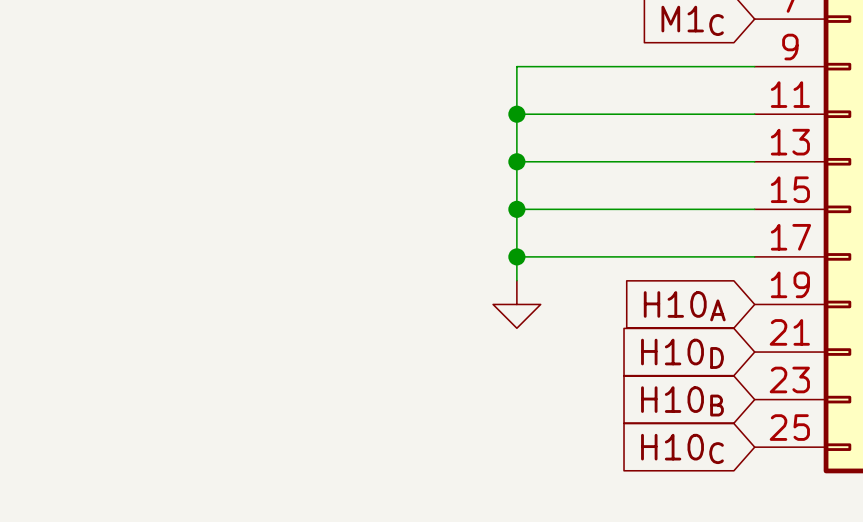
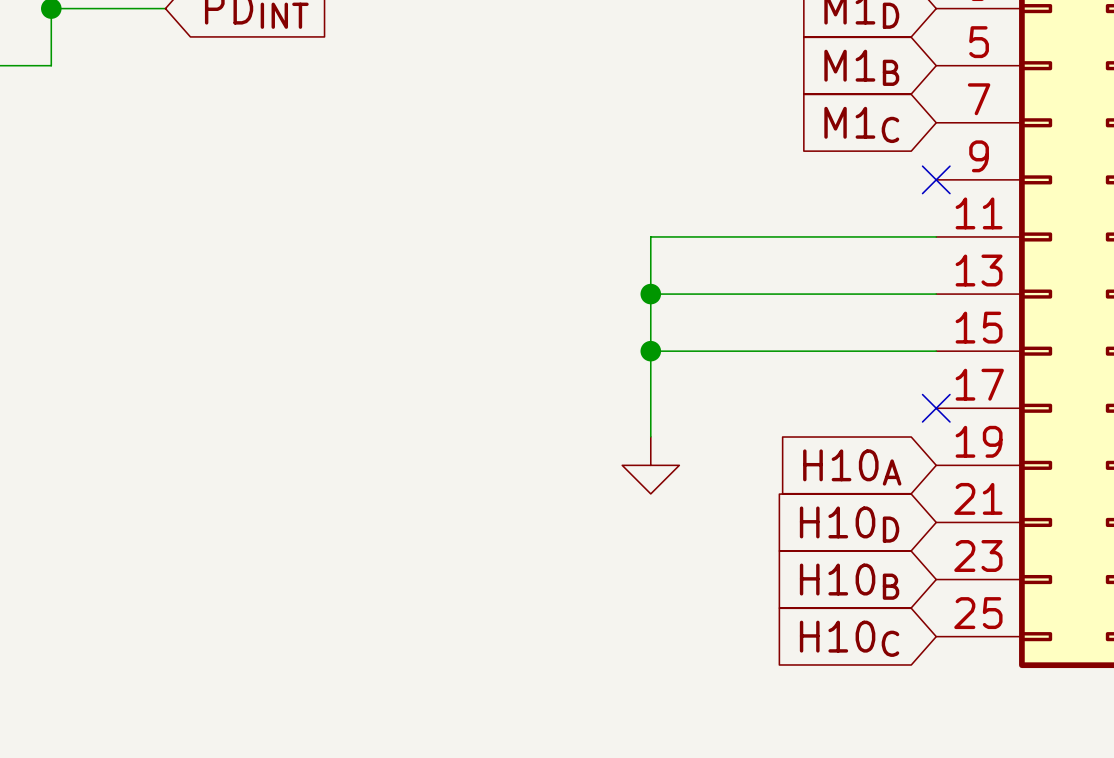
wire: (754, 66) (516, 66) (516, 114) -> none
no-connect mark: none -> (936, 179)
junction: (516, 114) -> none
wire: (516, 256) (754, 256) -> none
junction: (516, 256) -> none
no-connect mark: none -> (936, 408)

